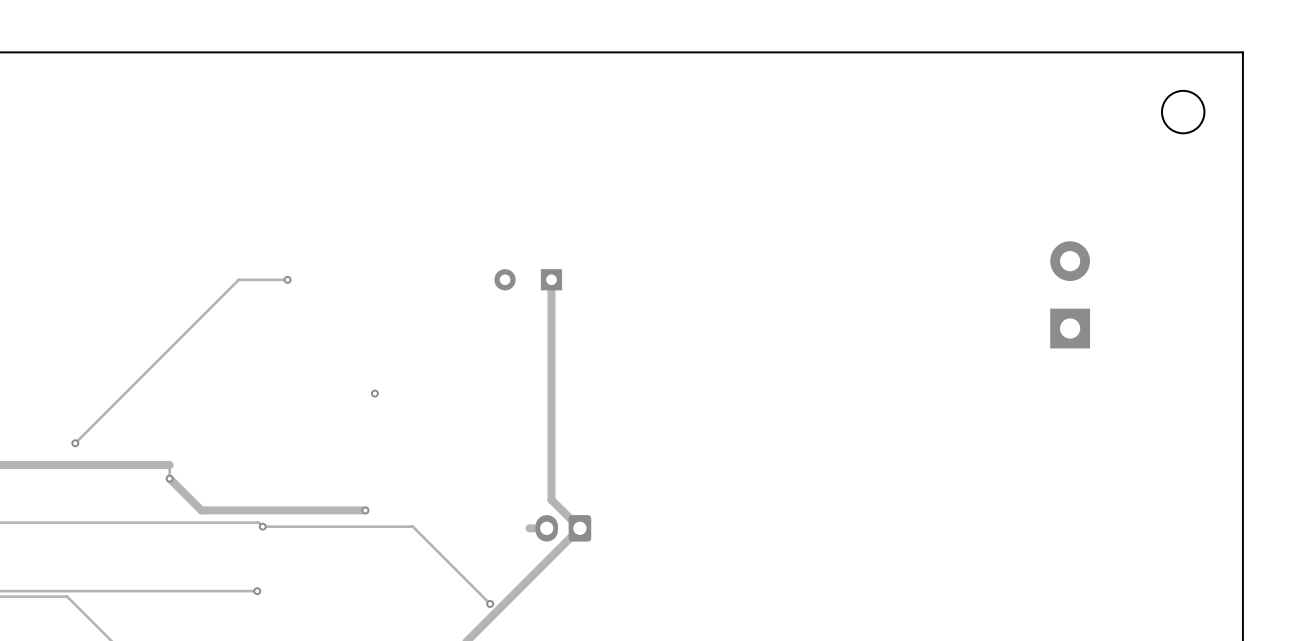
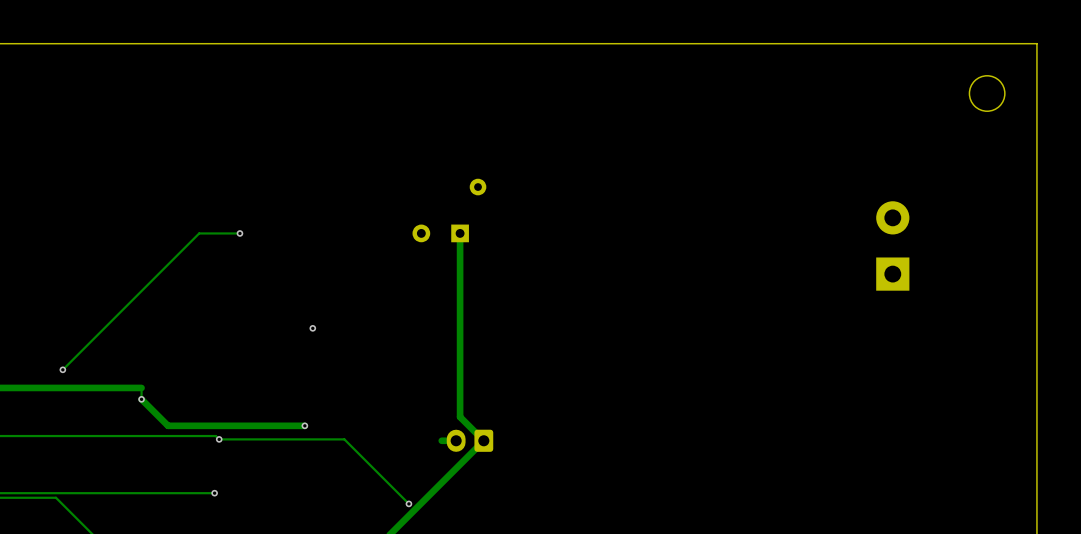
part: none -> (478, 187)

